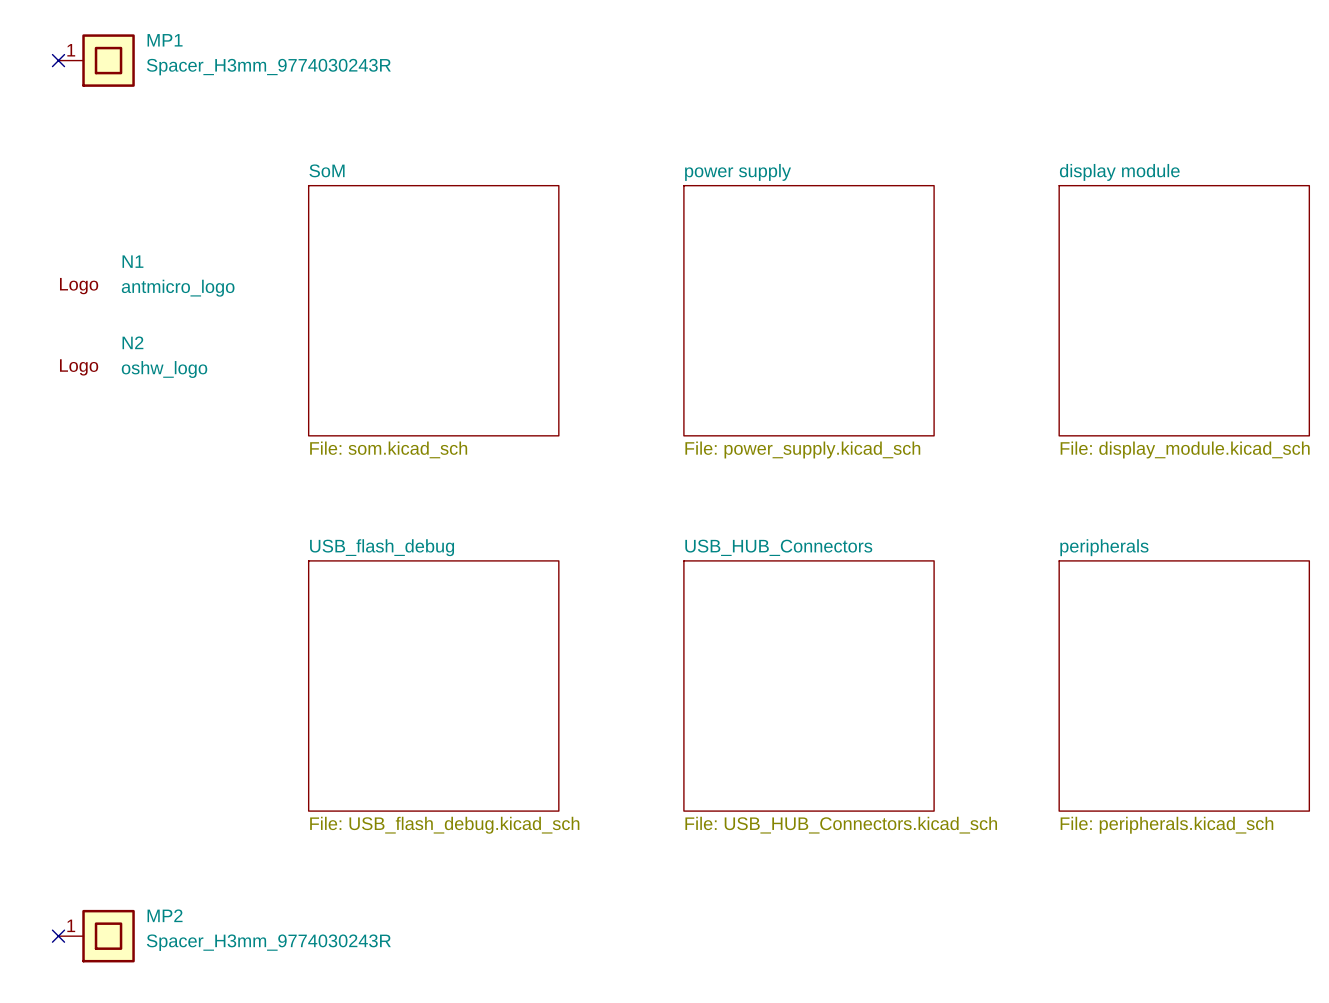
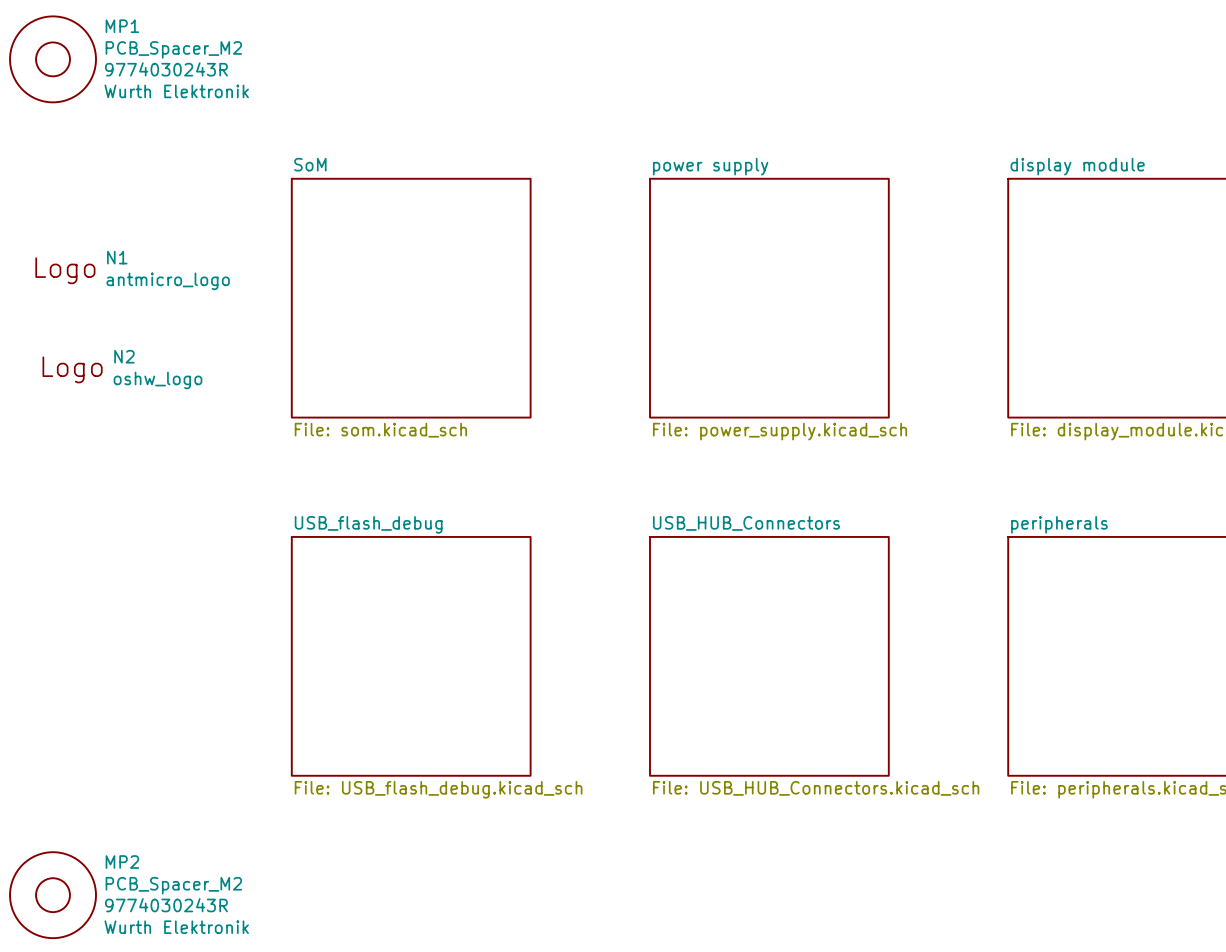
MP1 symbol: [58, 34, 135, 87] -> [10, 16, 96, 103]
no-connect mark: (58, 60) -> none
MP1 value: Spacer_H3mm_9774030243R (268, 67) -> PCB_Spacer_M2 (173, 49)
MP1 text: none -> 9774030243R (166, 69)
MP1 text: none -> Wurth Elektronik (176, 91)
N1 symbol: [59, 255, 235, 297] -> [35, 250, 230, 291]
N2 symbol: [59, 336, 208, 378] -> [42, 350, 203, 390]
MP2 symbol: [58, 909, 135, 963] -> [10, 852, 96, 939]
no-connect mark: (58, 936) -> none
MP2 value: Spacer_H3mm_9774030243R (268, 942) -> PCB_Spacer_M2 (173, 885)
MP2 text: none -> 9774030243R (166, 905)
MP2 text: none -> Wurth Elektronik (176, 927)

